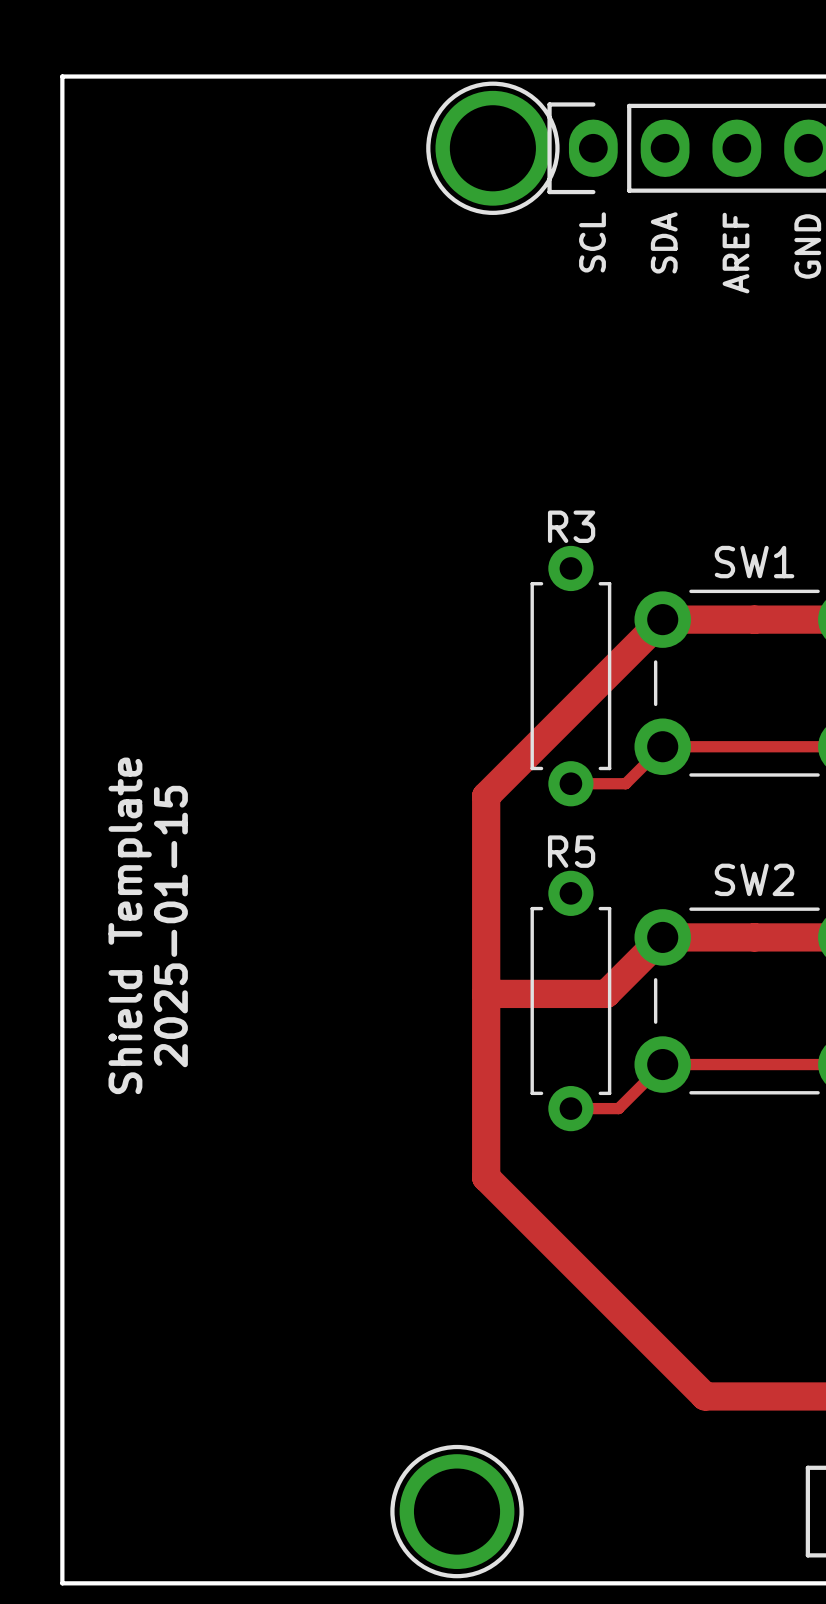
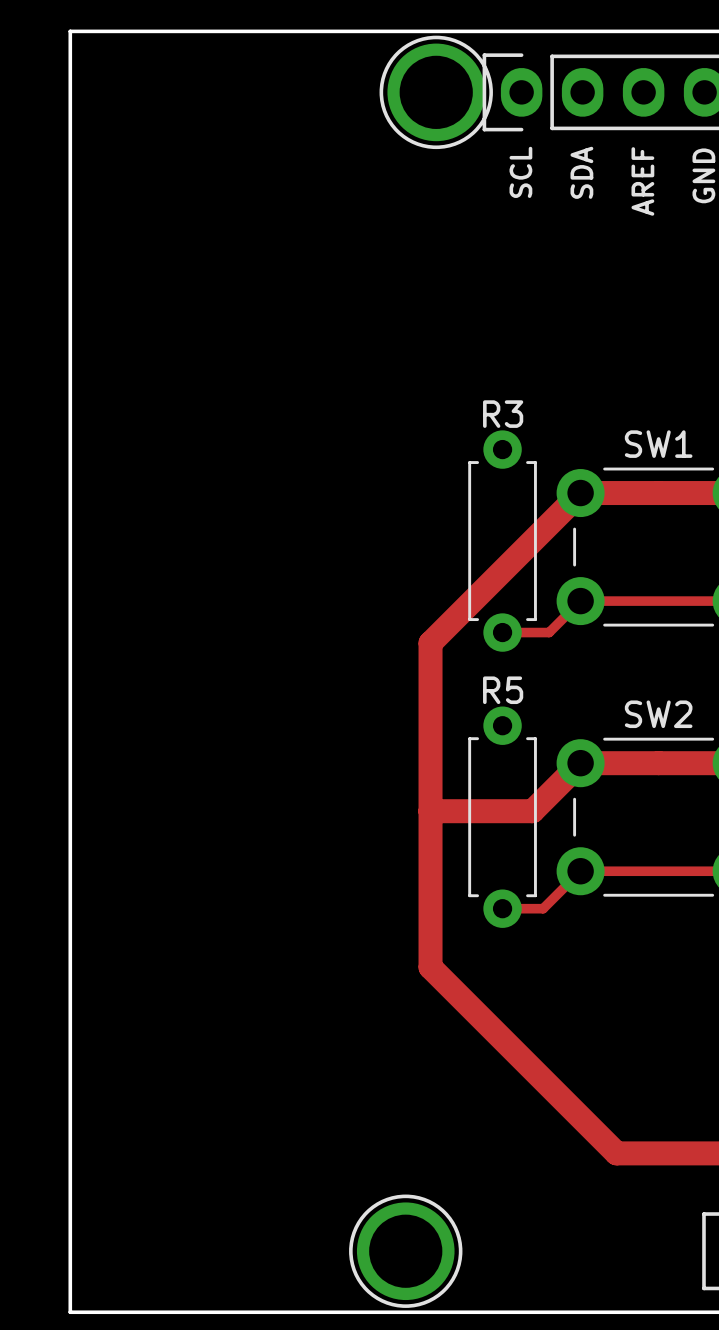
text: Shield Template (130, 925) -> none
text: 2025-01-15 (170, 926) -> none

